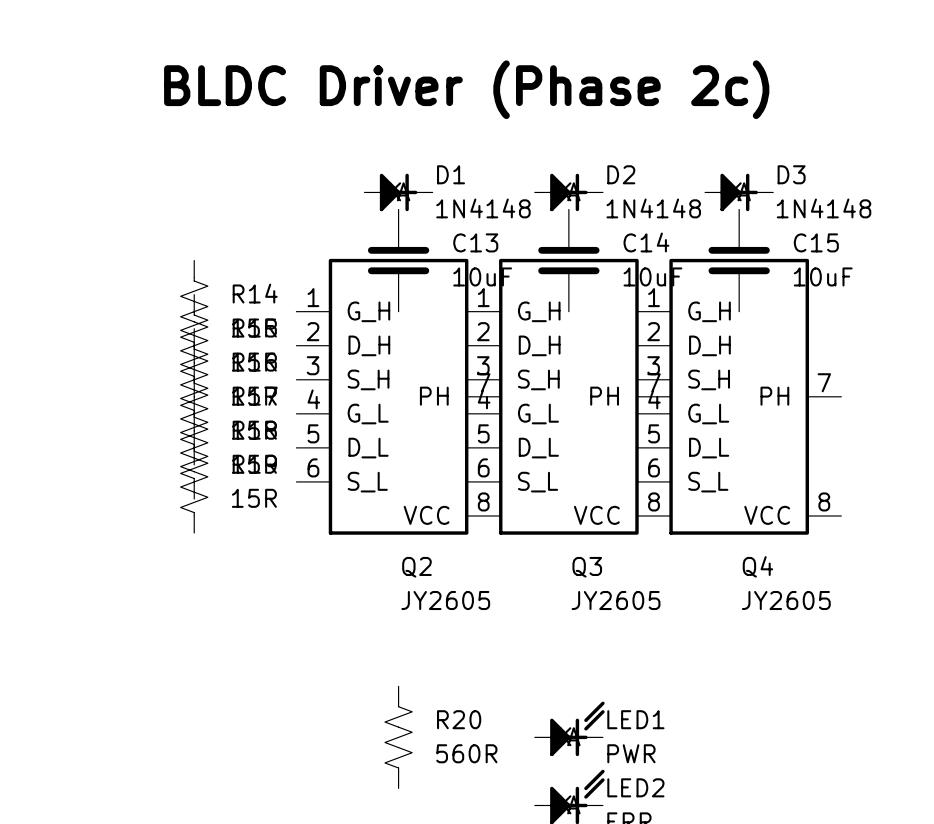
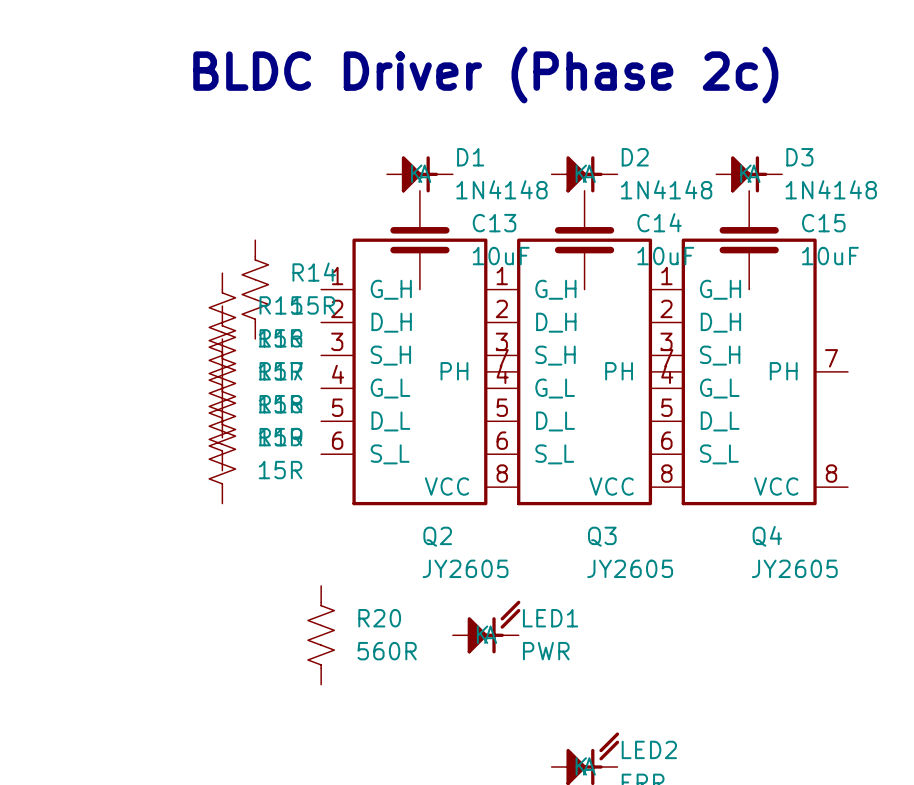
R14 position: (194, 311) -> (255, 289)
LED1 position: (569, 728) -> (486, 627)
R20 position: (398, 737) -> (321, 635)

